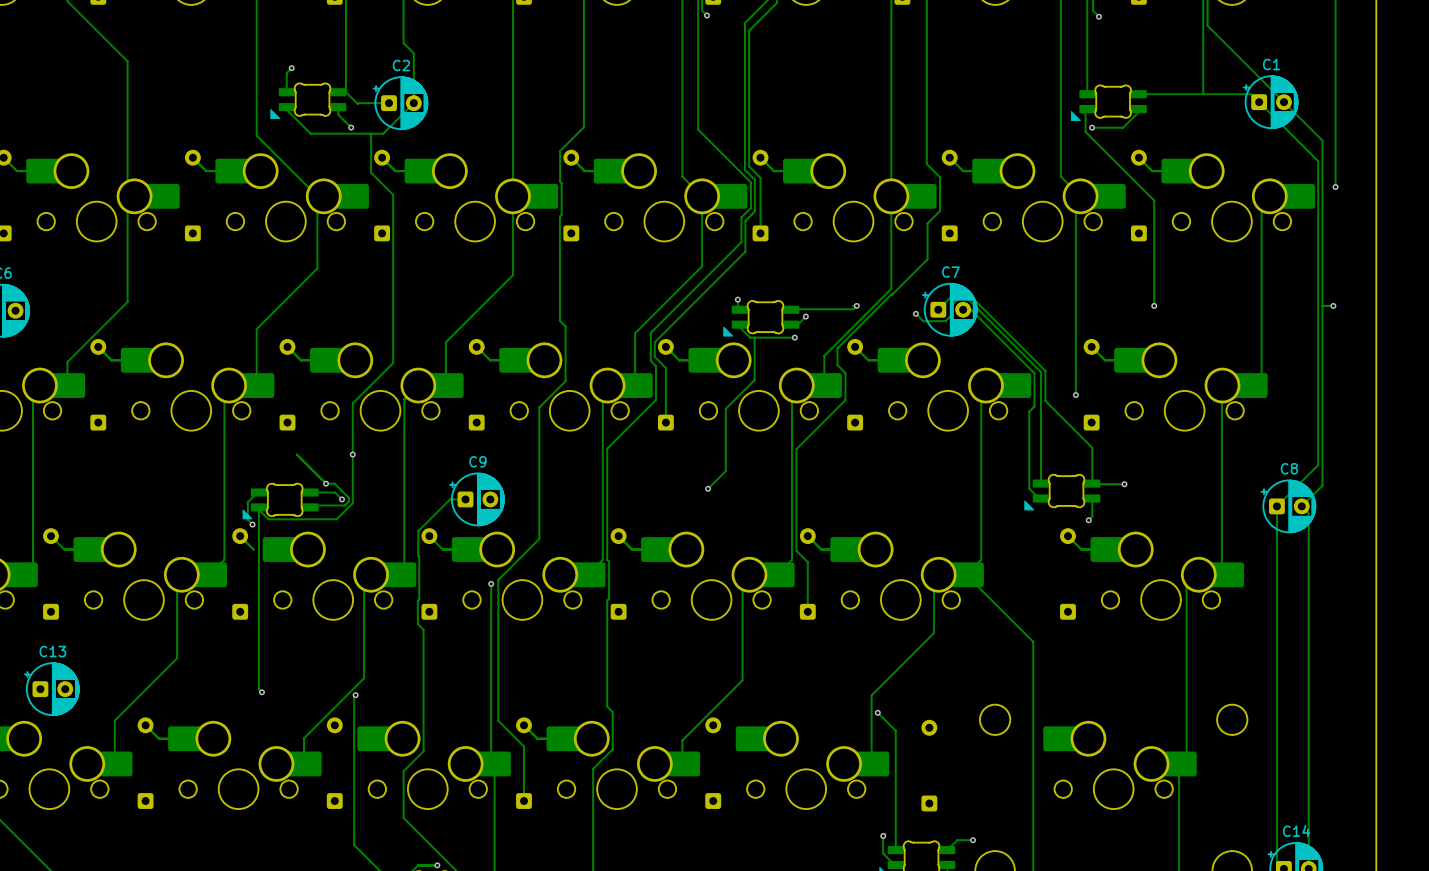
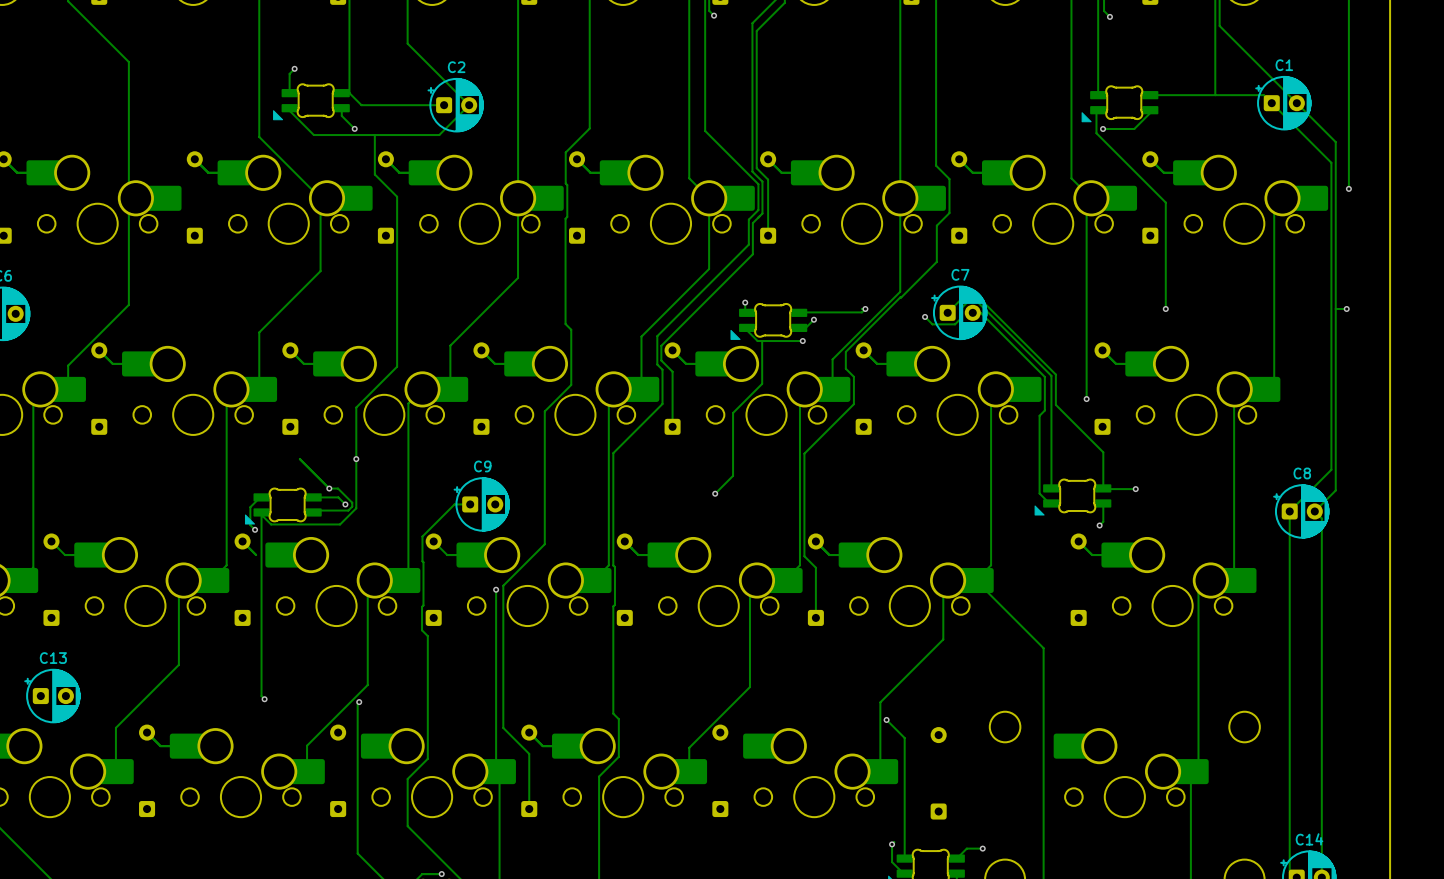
track: (413, 53) (413, 103) (383, 133) -> (417, 53) (469, 105) (439, 135) (387, 135)
track: (388, 103) (357, 104) -> (444, 105) (361, 105)
C2 position: (400, 103) -> (455, 105)

